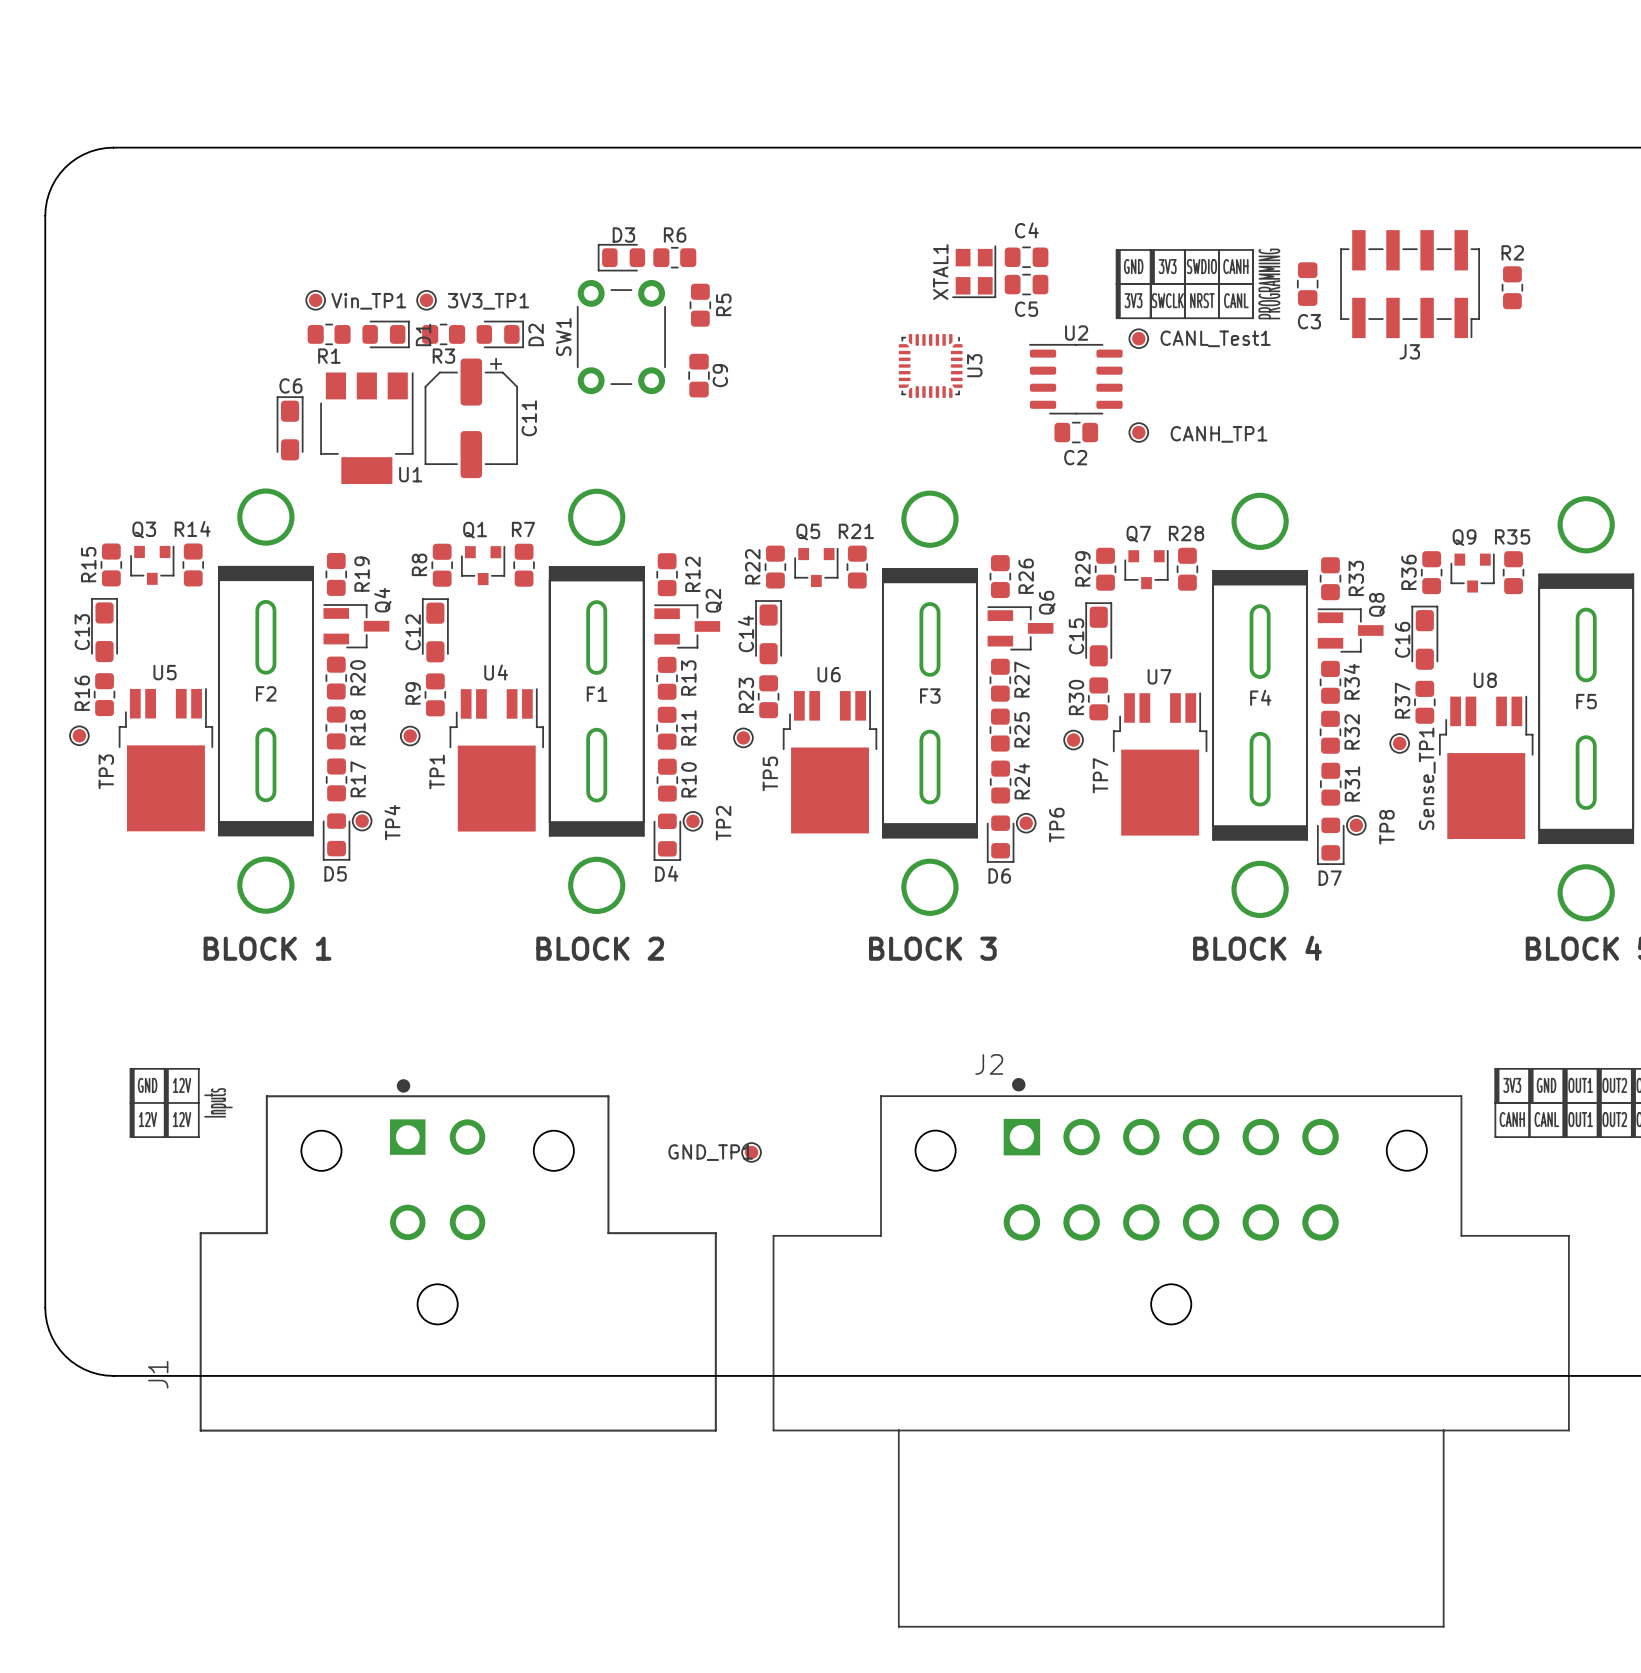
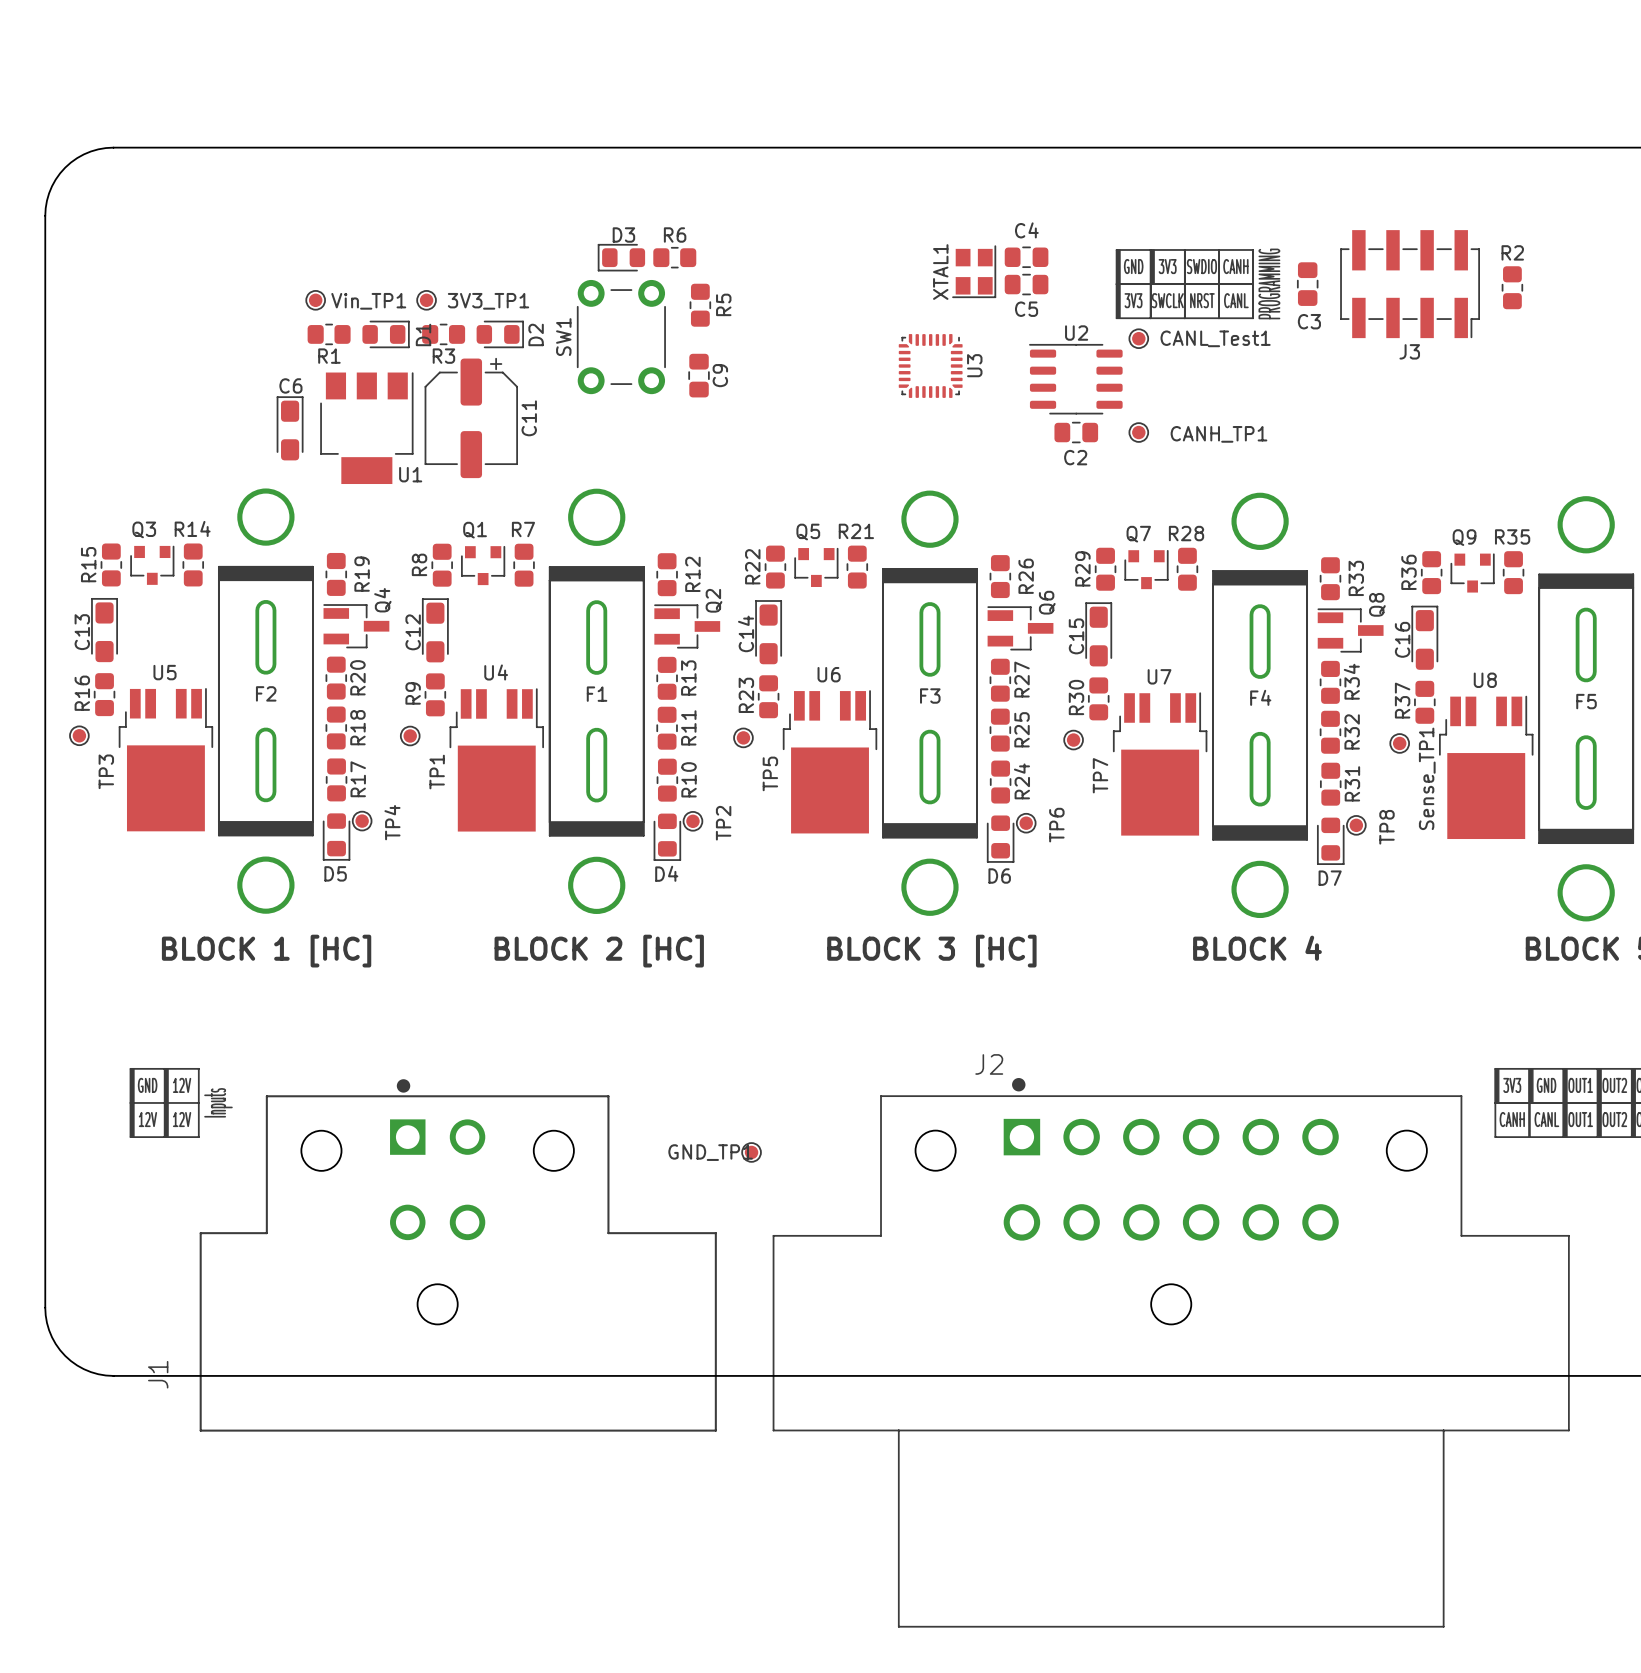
text: BLOCK 1 (267, 948) -> BLOCK 1 [HC] (266, 951)
text: BLOCK 2 (600, 948) -> BLOCK 2 [HC] (599, 951)
text: BLOCK 3 (932, 948) -> BLOCK 3 [HC] (931, 951)

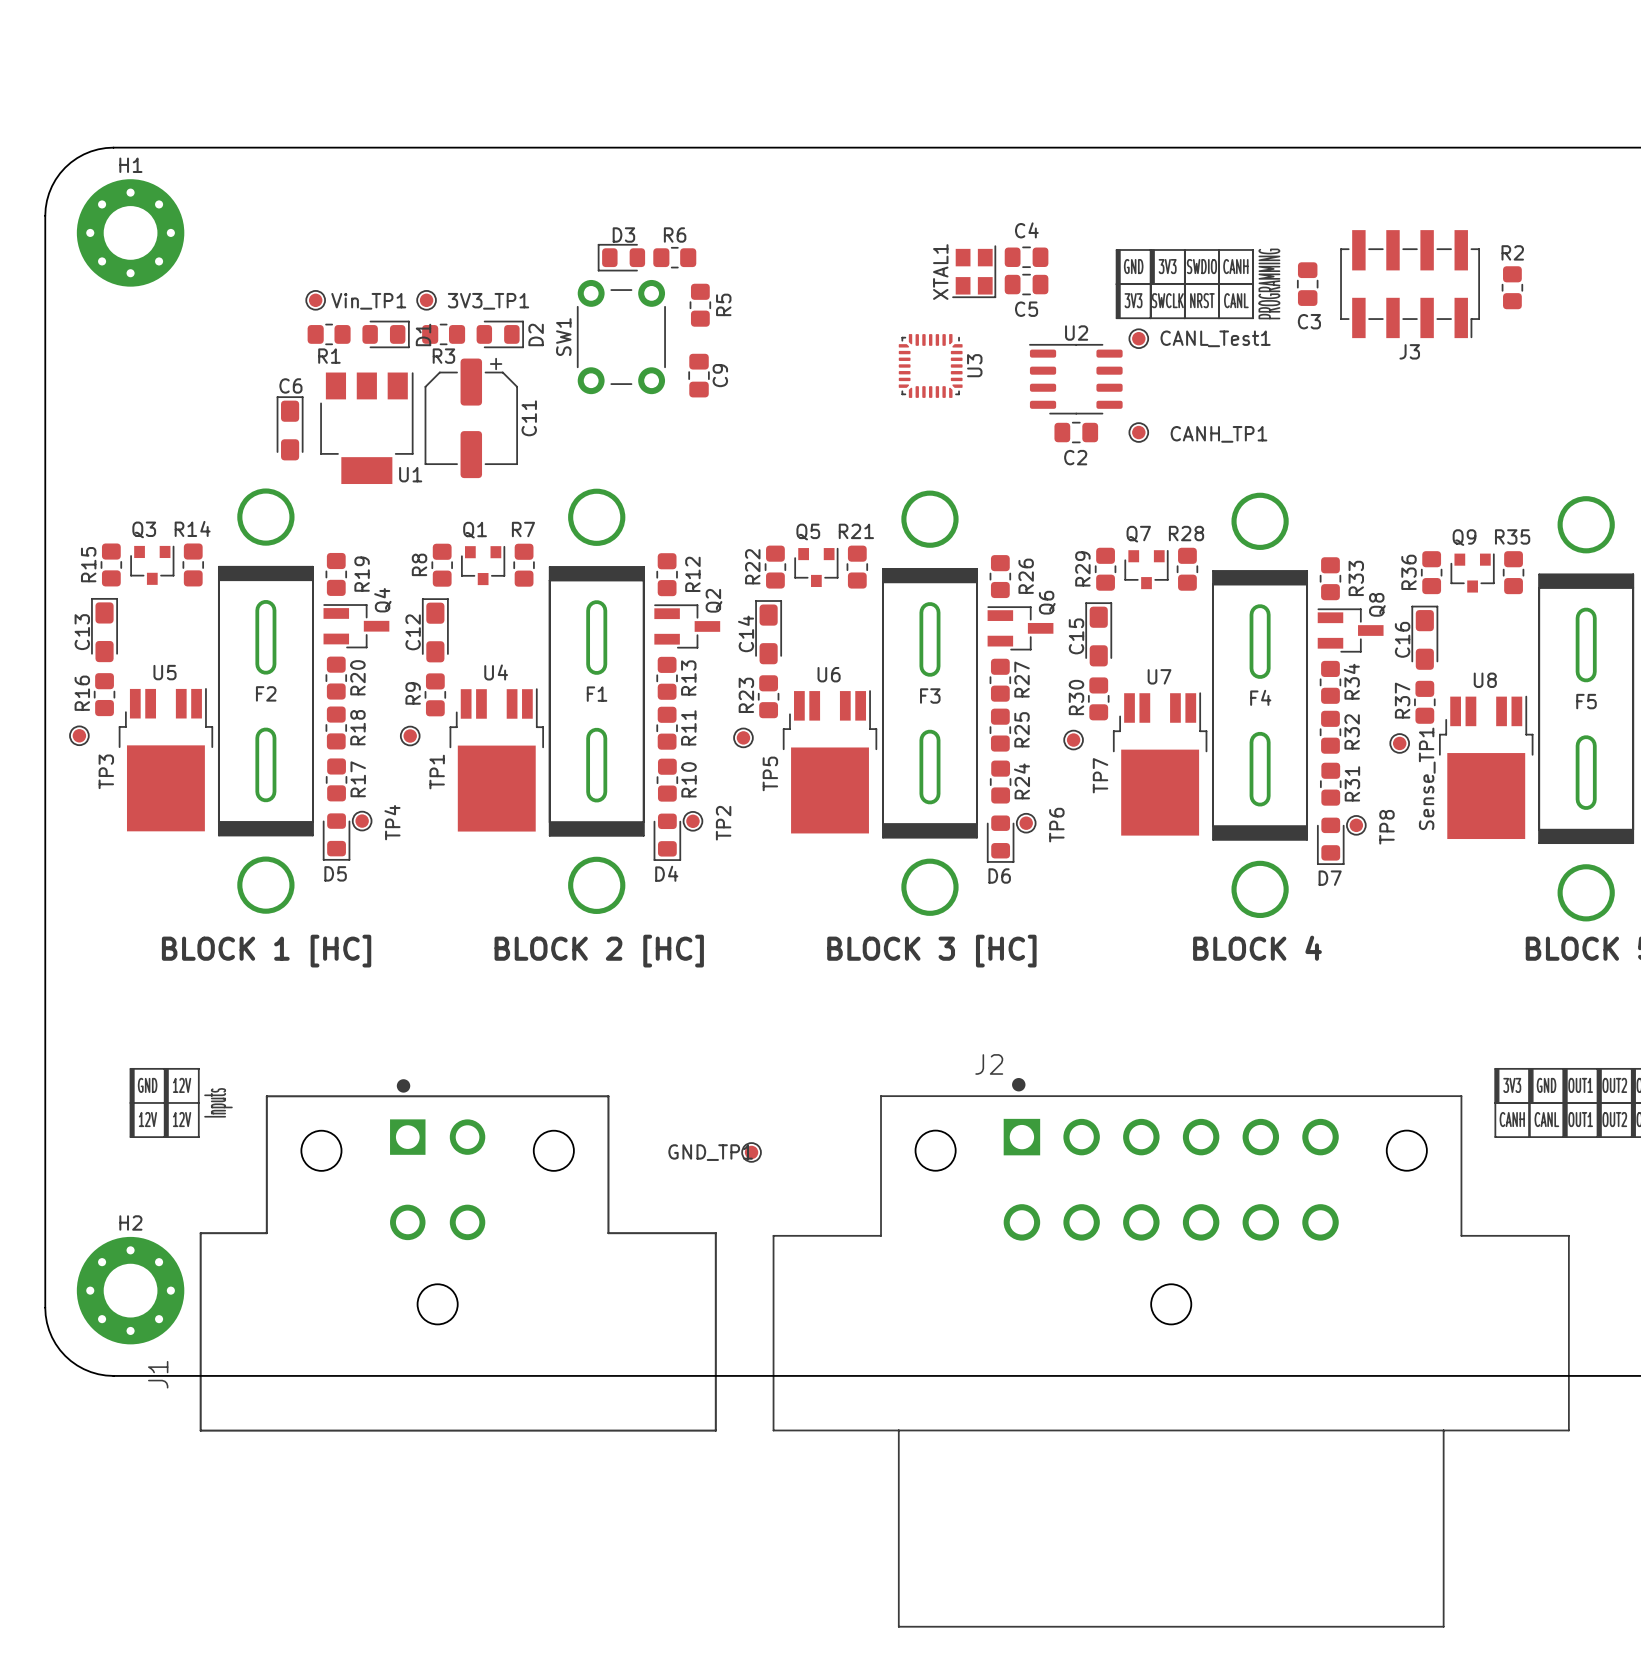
H1: none -> (130, 232)
H2: none -> (130, 1290)

